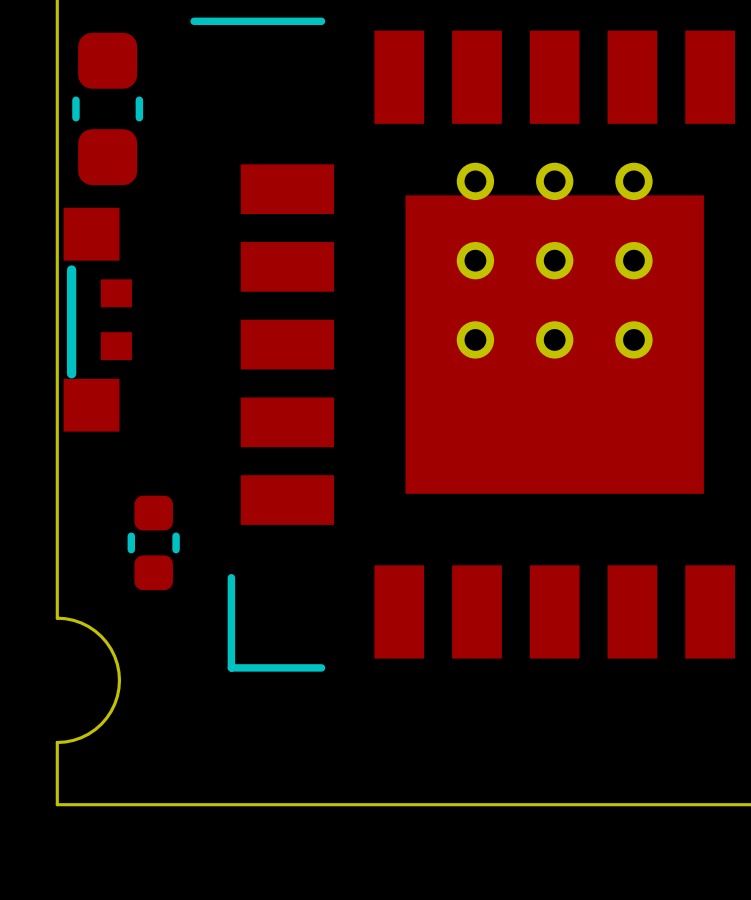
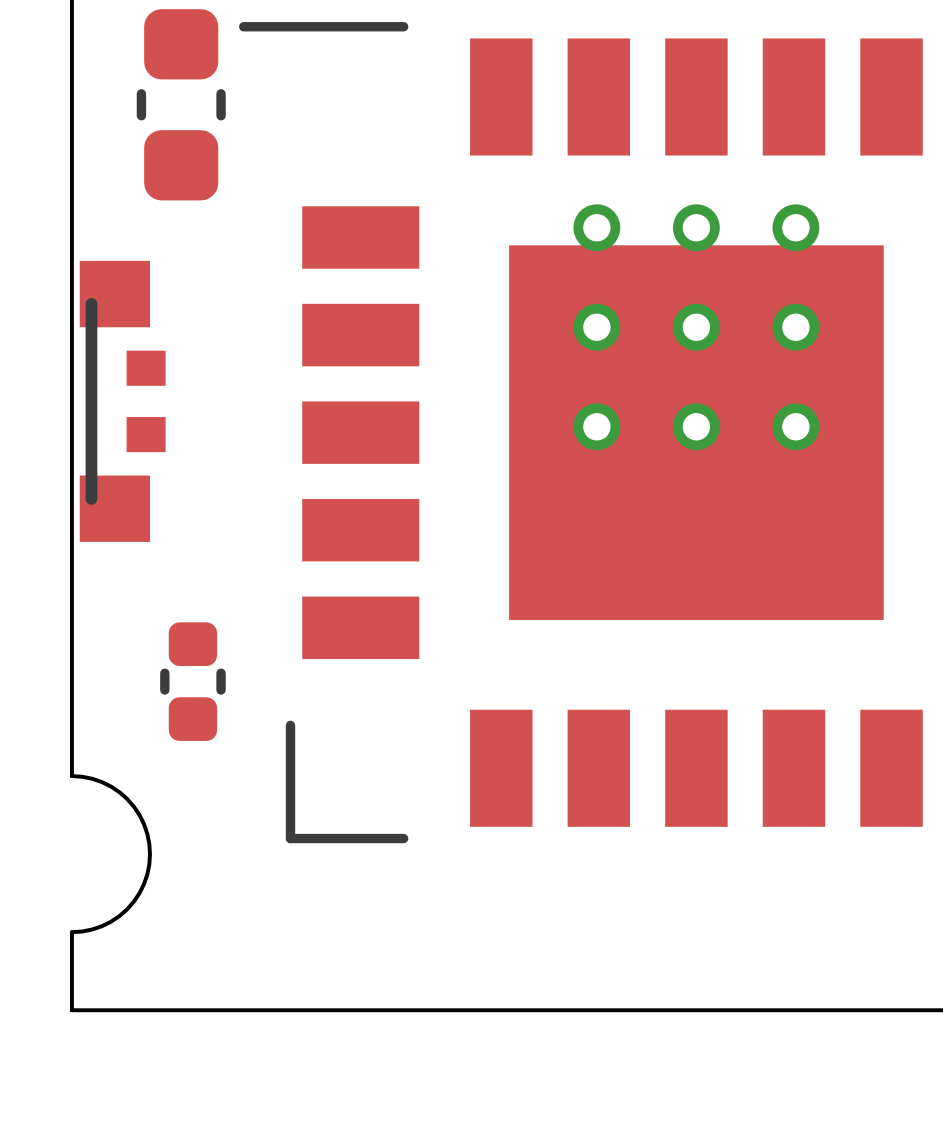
part position: (107, 108) -> (181, 104)
part footprint: [63, 207, 132, 432] -> [79, 260, 166, 542]

